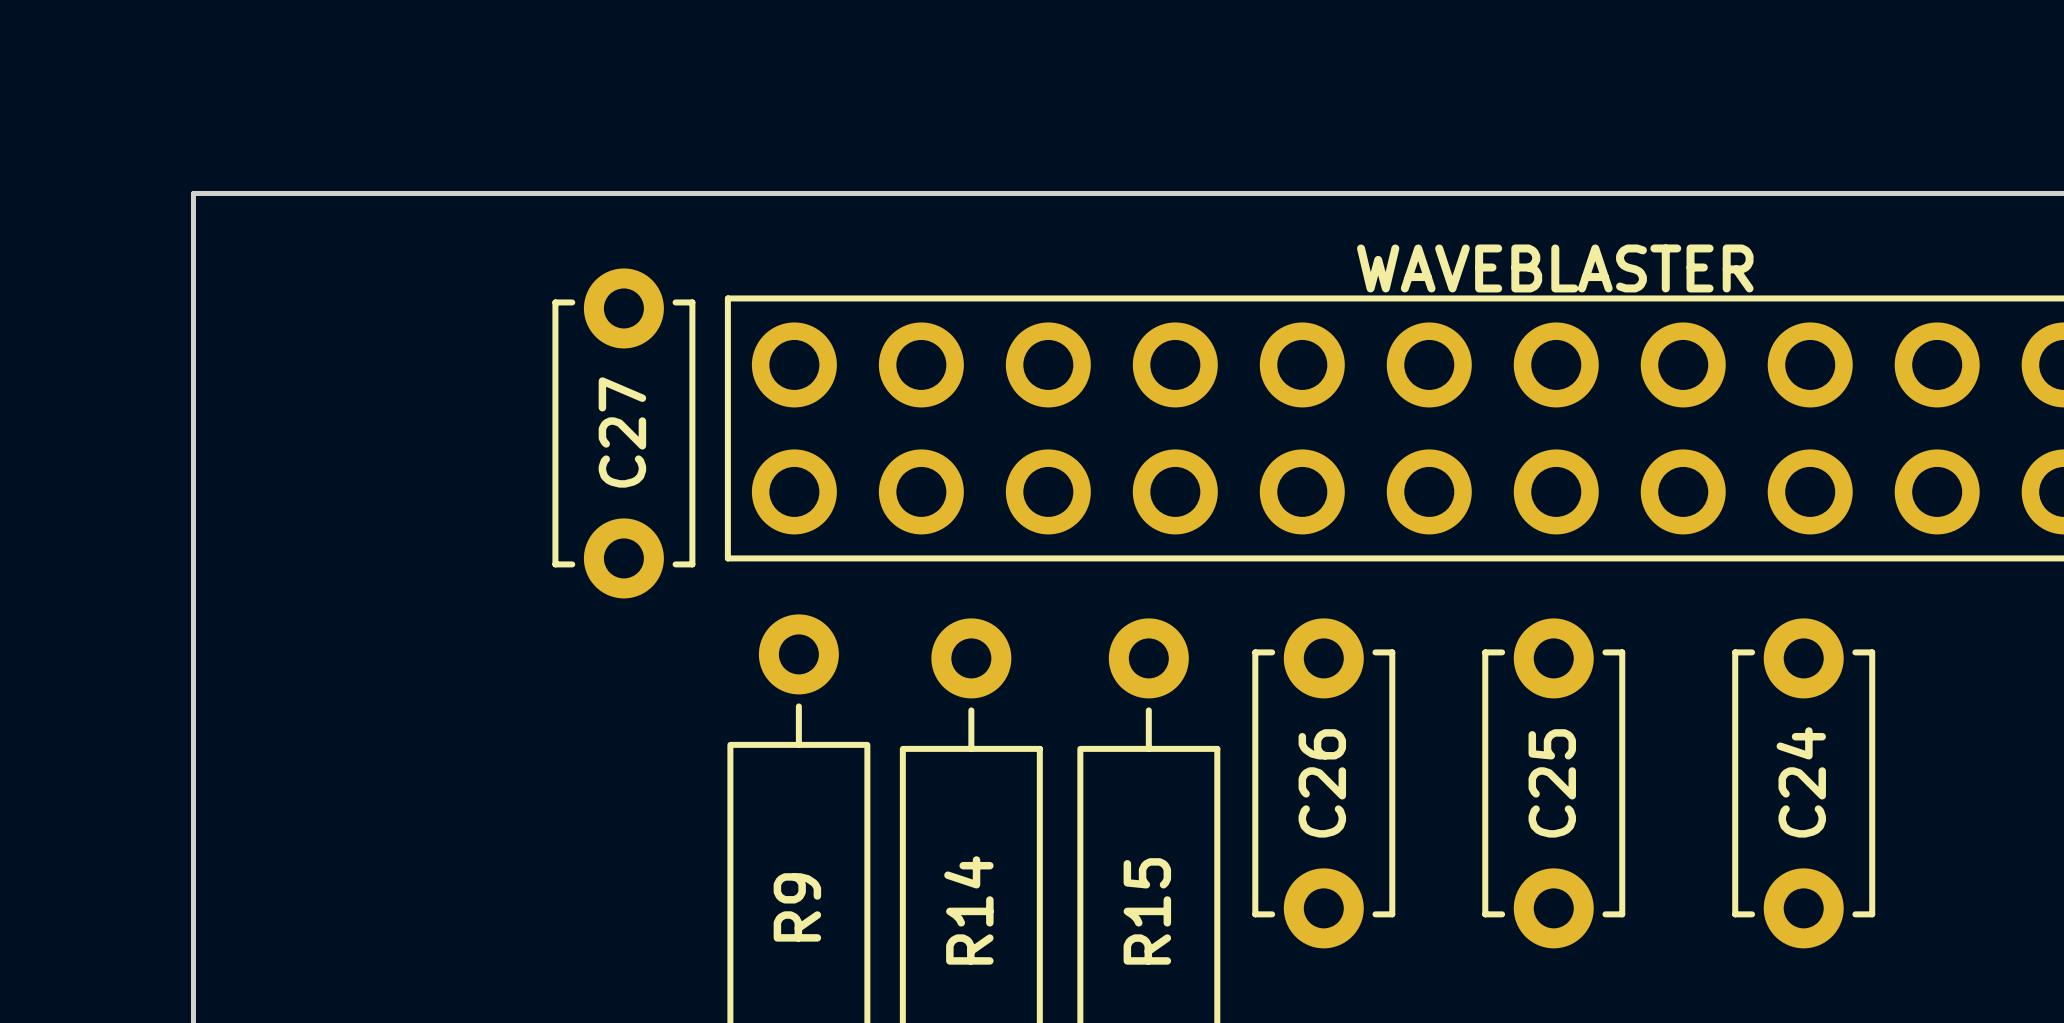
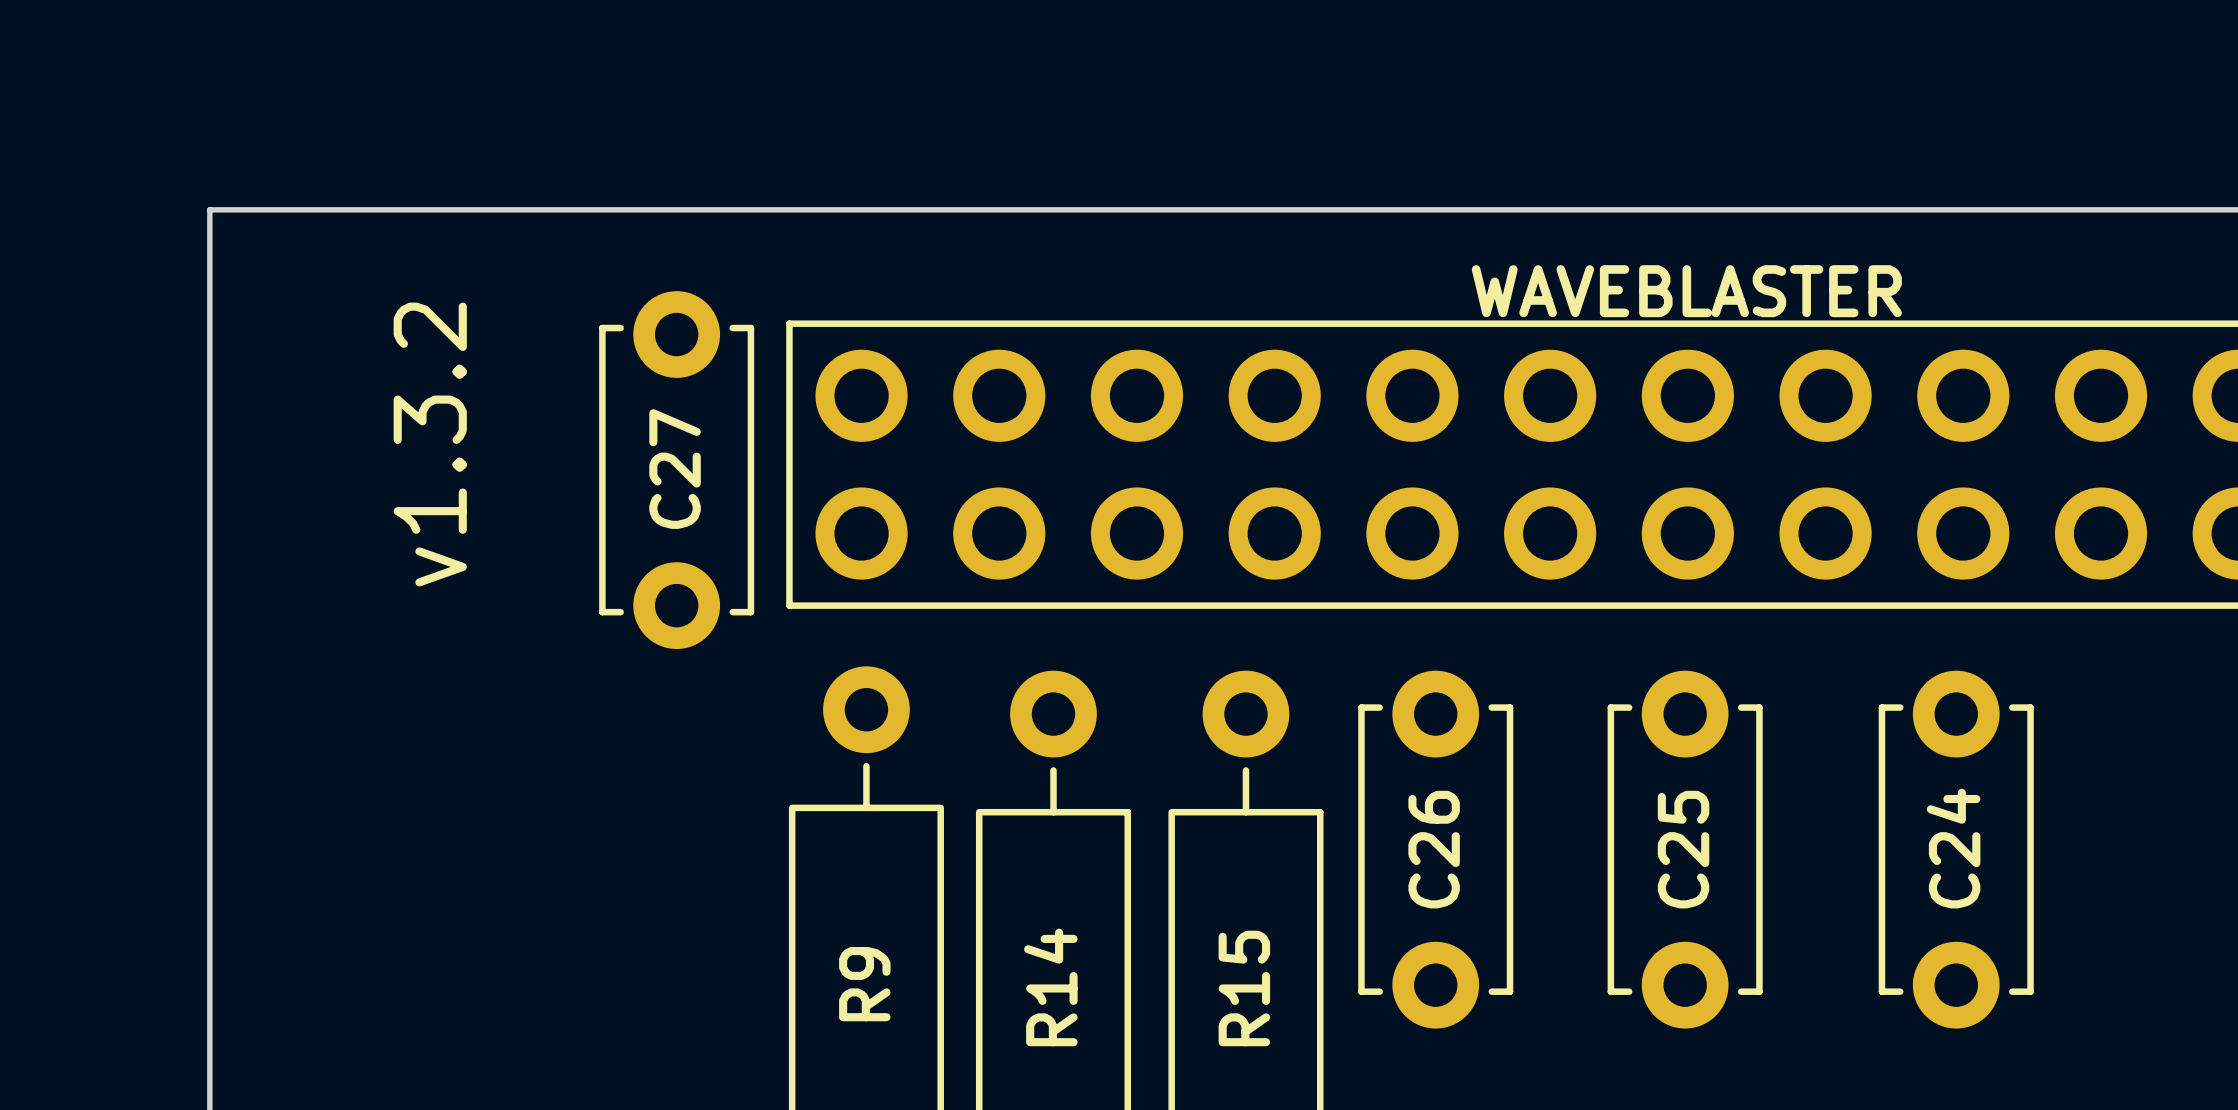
text: none -> v1.3.2 (430, 444)

